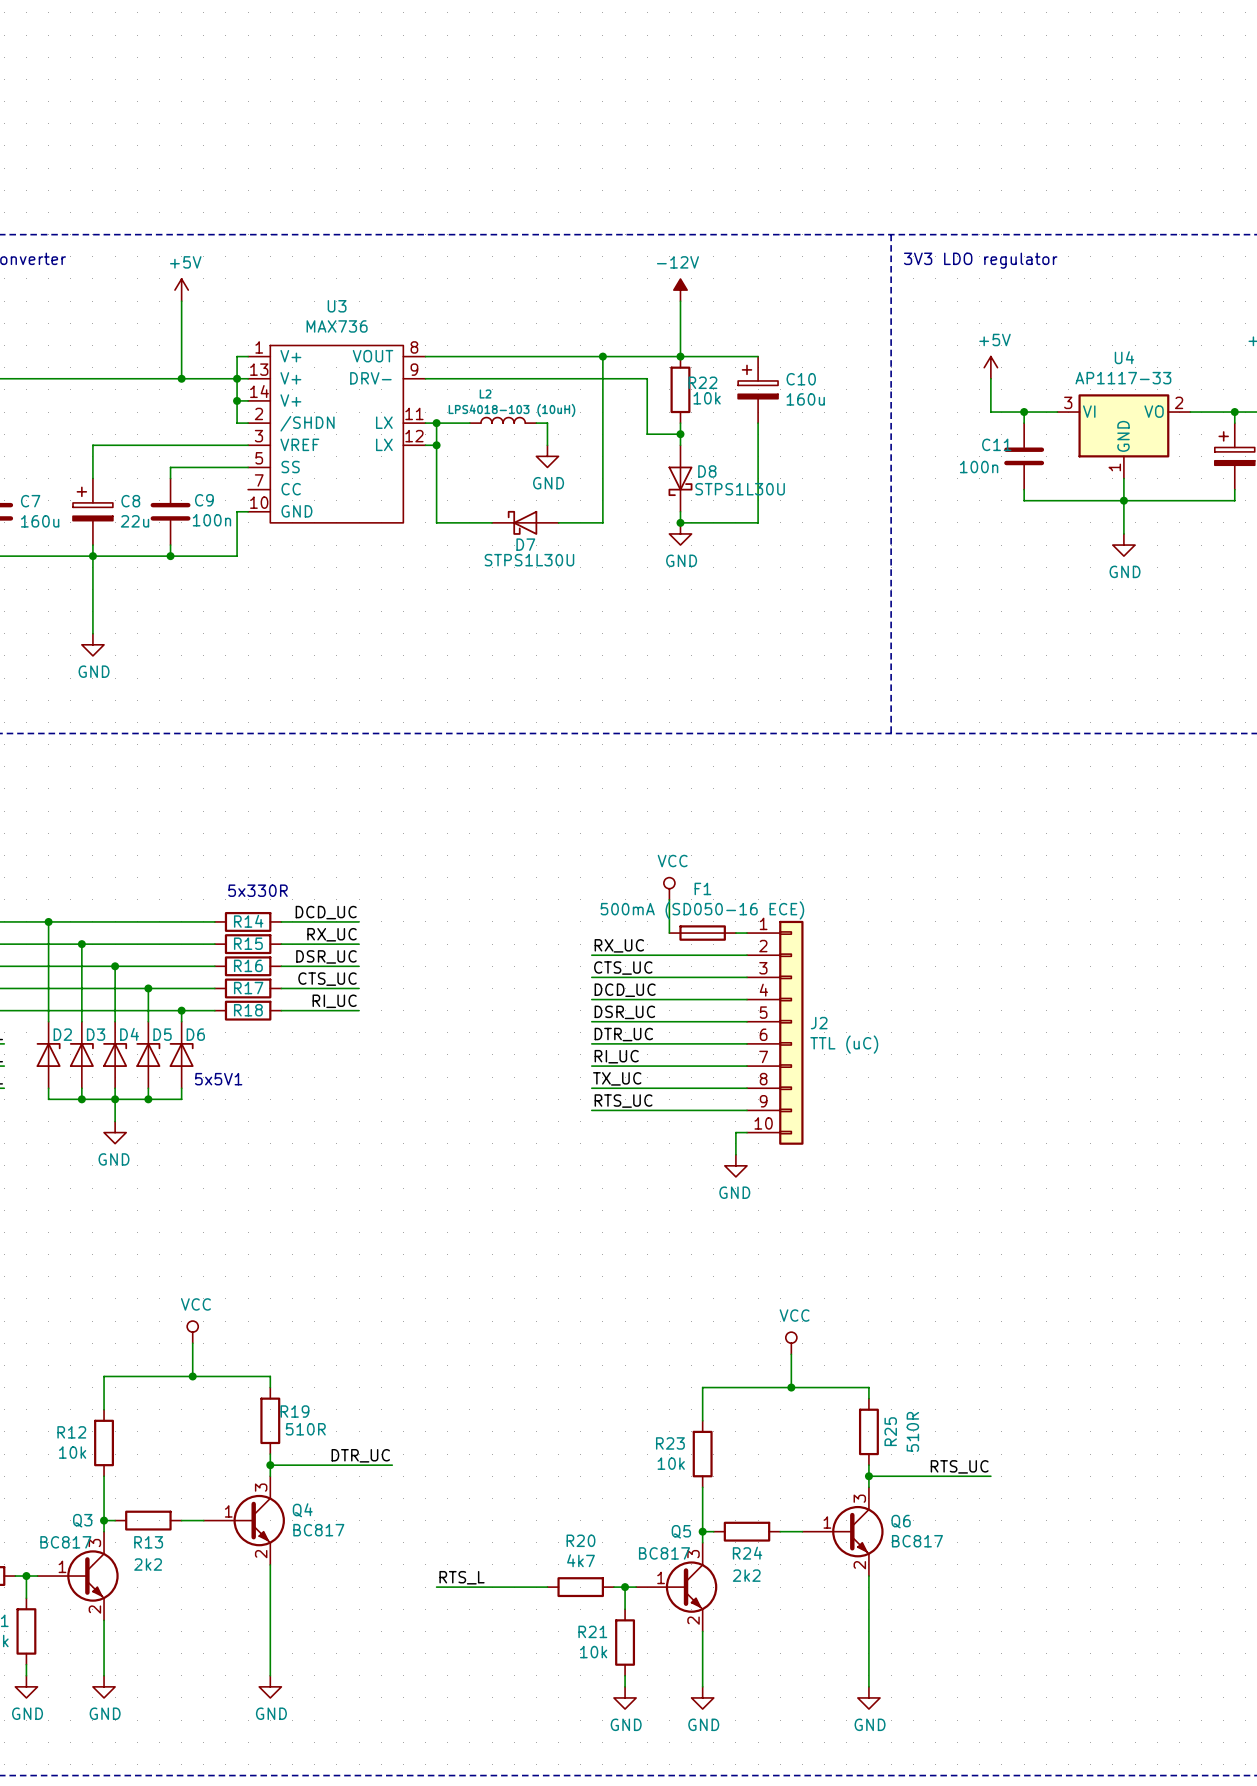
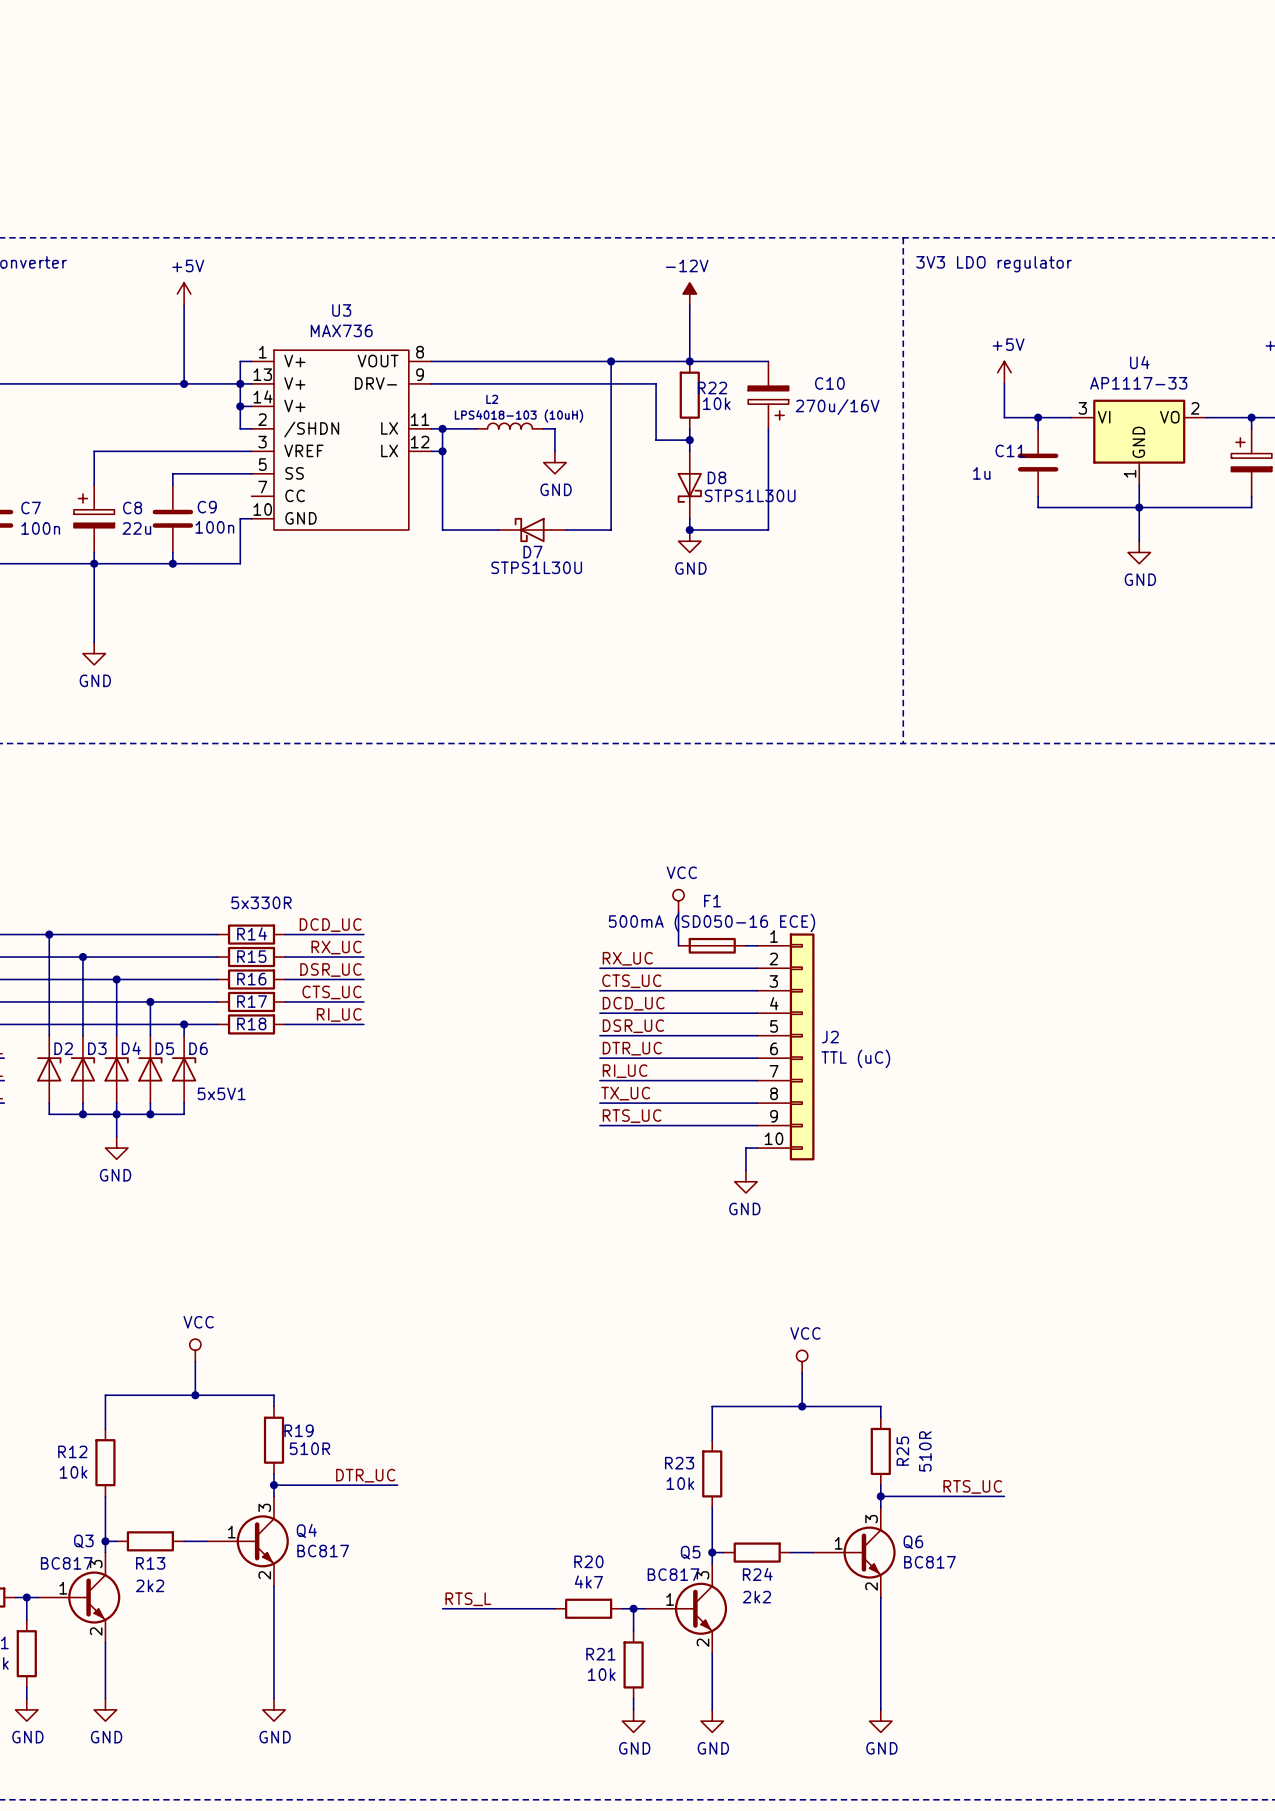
C10 rotation: 0° (758, 382) -> 180° (768, 403)
C10 value: 160u (805, 399) -> 270u/16V (837, 407)
C11 value: 100n (979, 467) -> 1u (981, 473)
C7 value: 160u (40, 521) -> 100n (40, 528)

